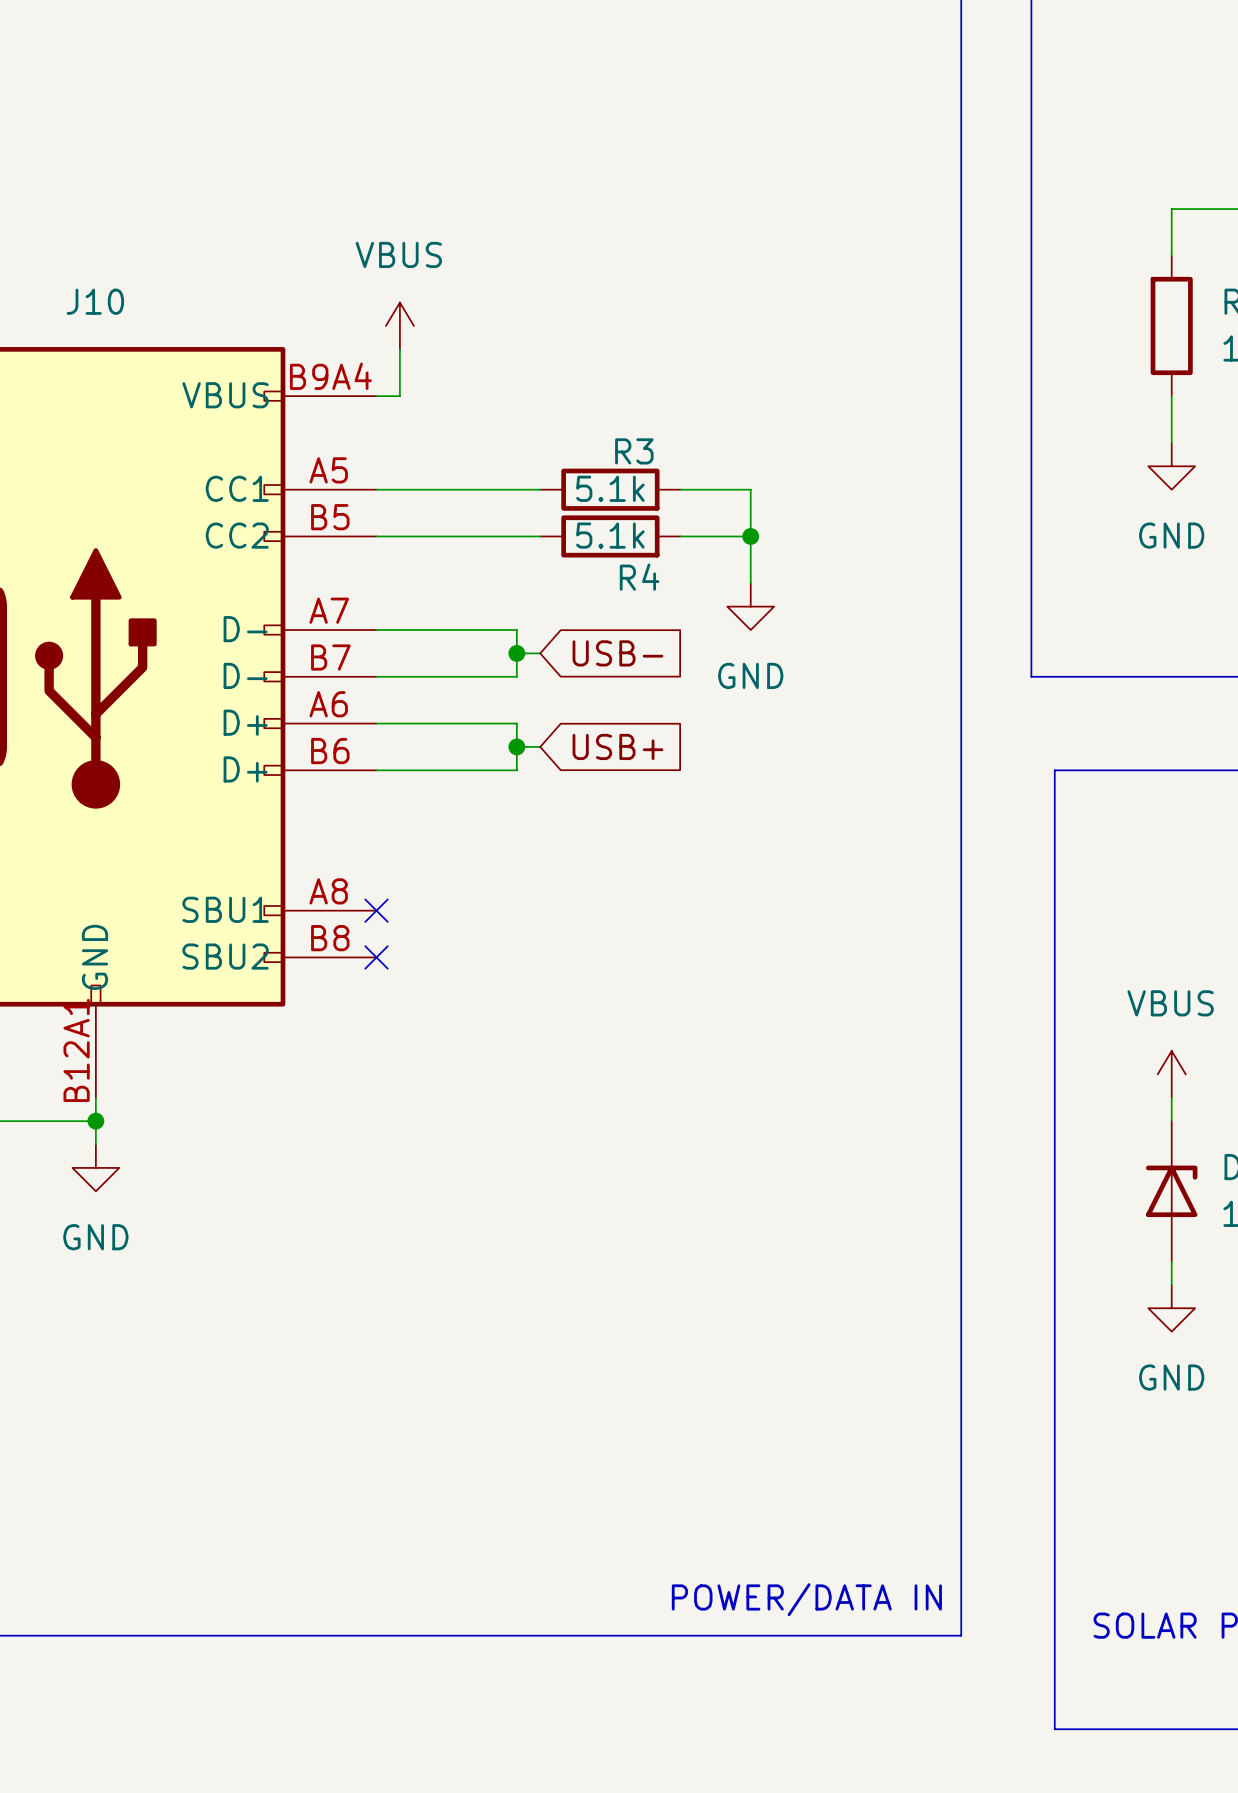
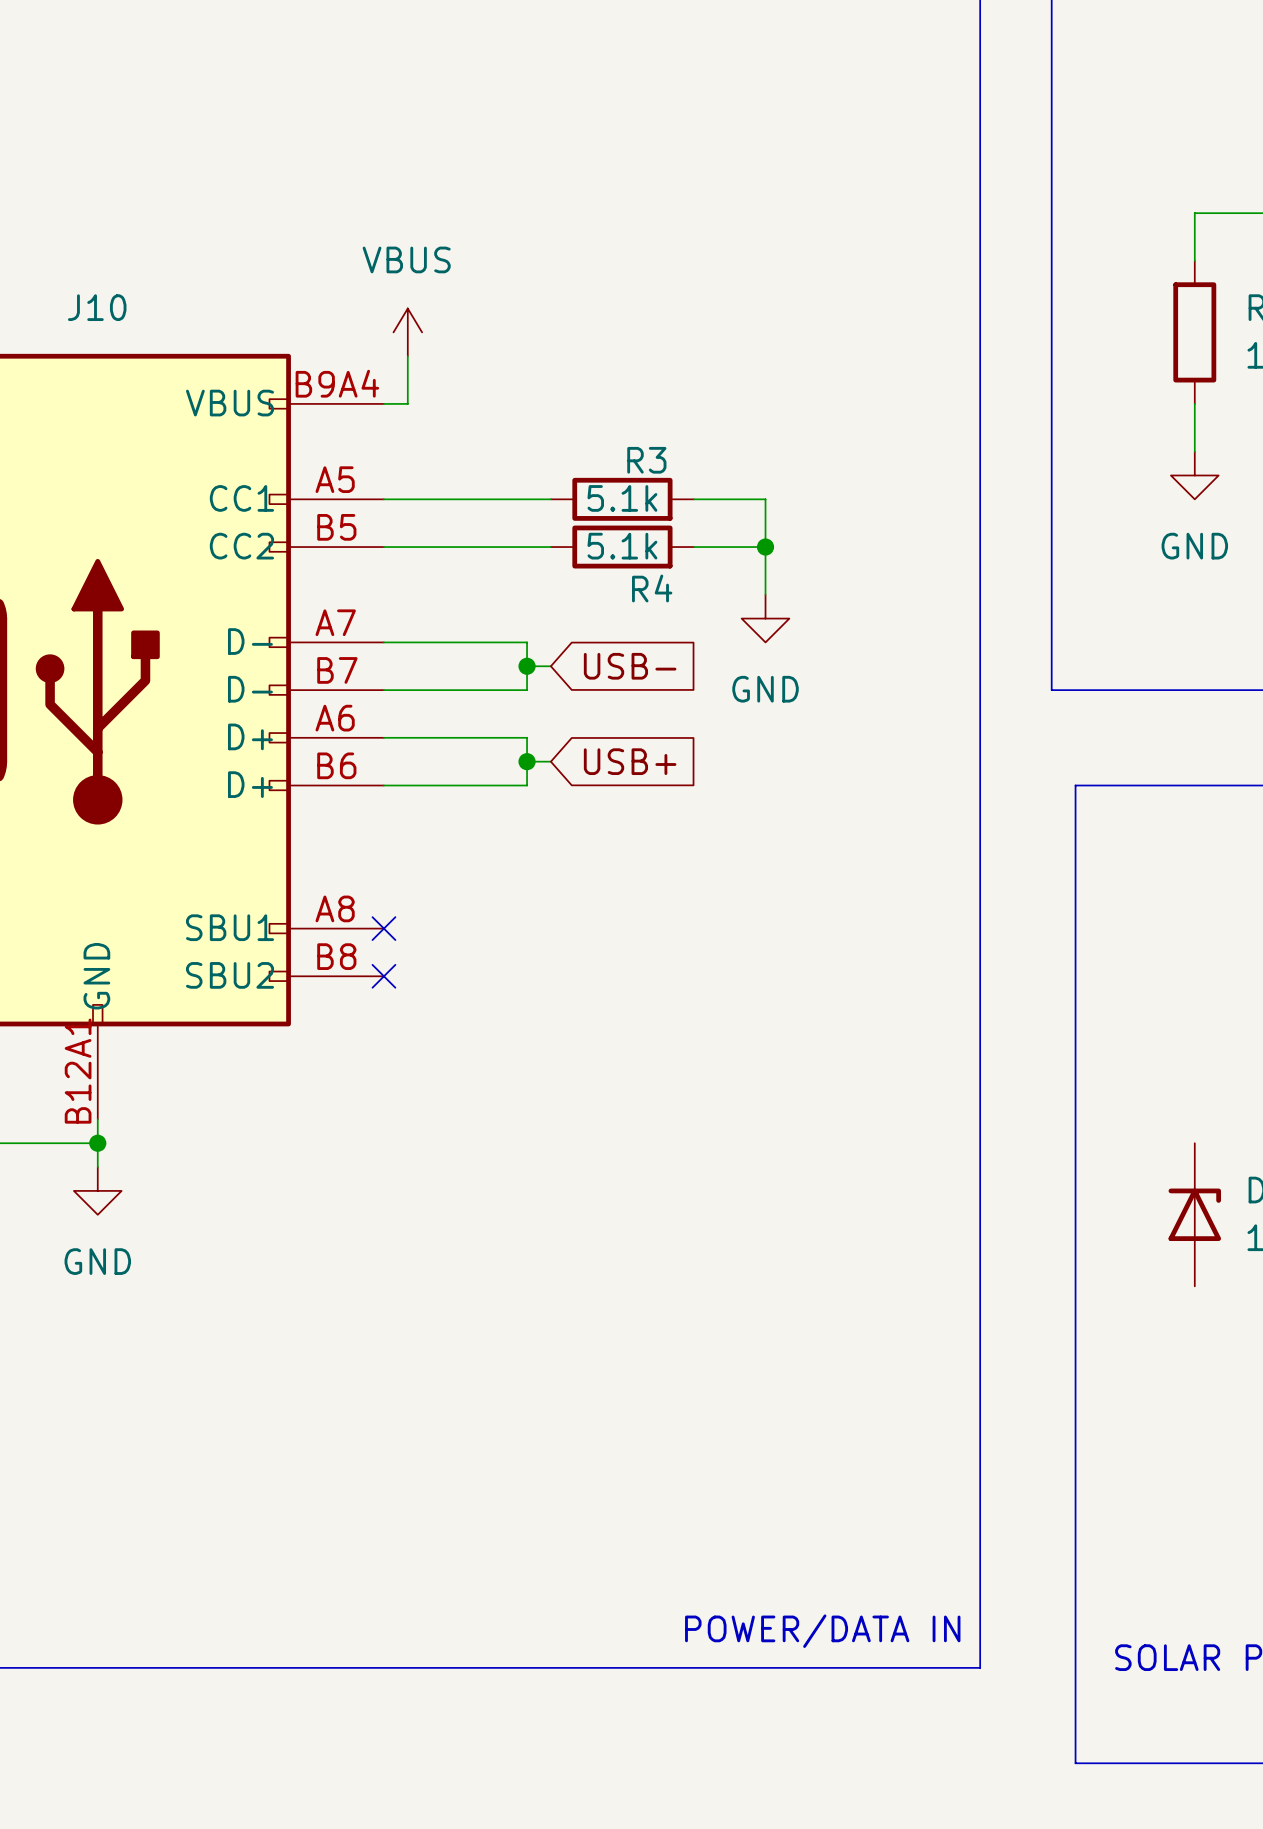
power symbol: VBUS (1171, 1074) -> none
wire: (1171, 1097) (1171, 1121) -> none
wire: (1171, 1261) (1171, 1284) -> none
power symbol: GND (1171, 1308) -> none

